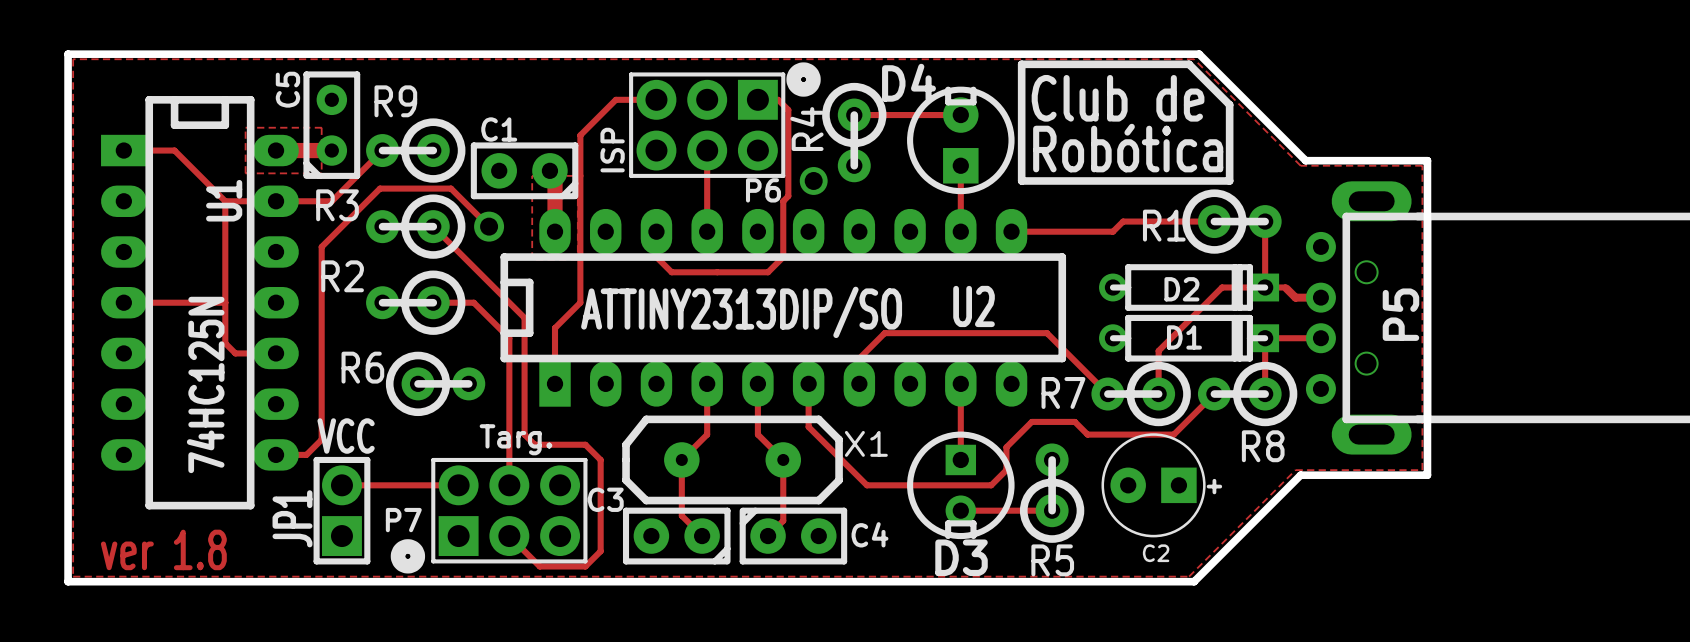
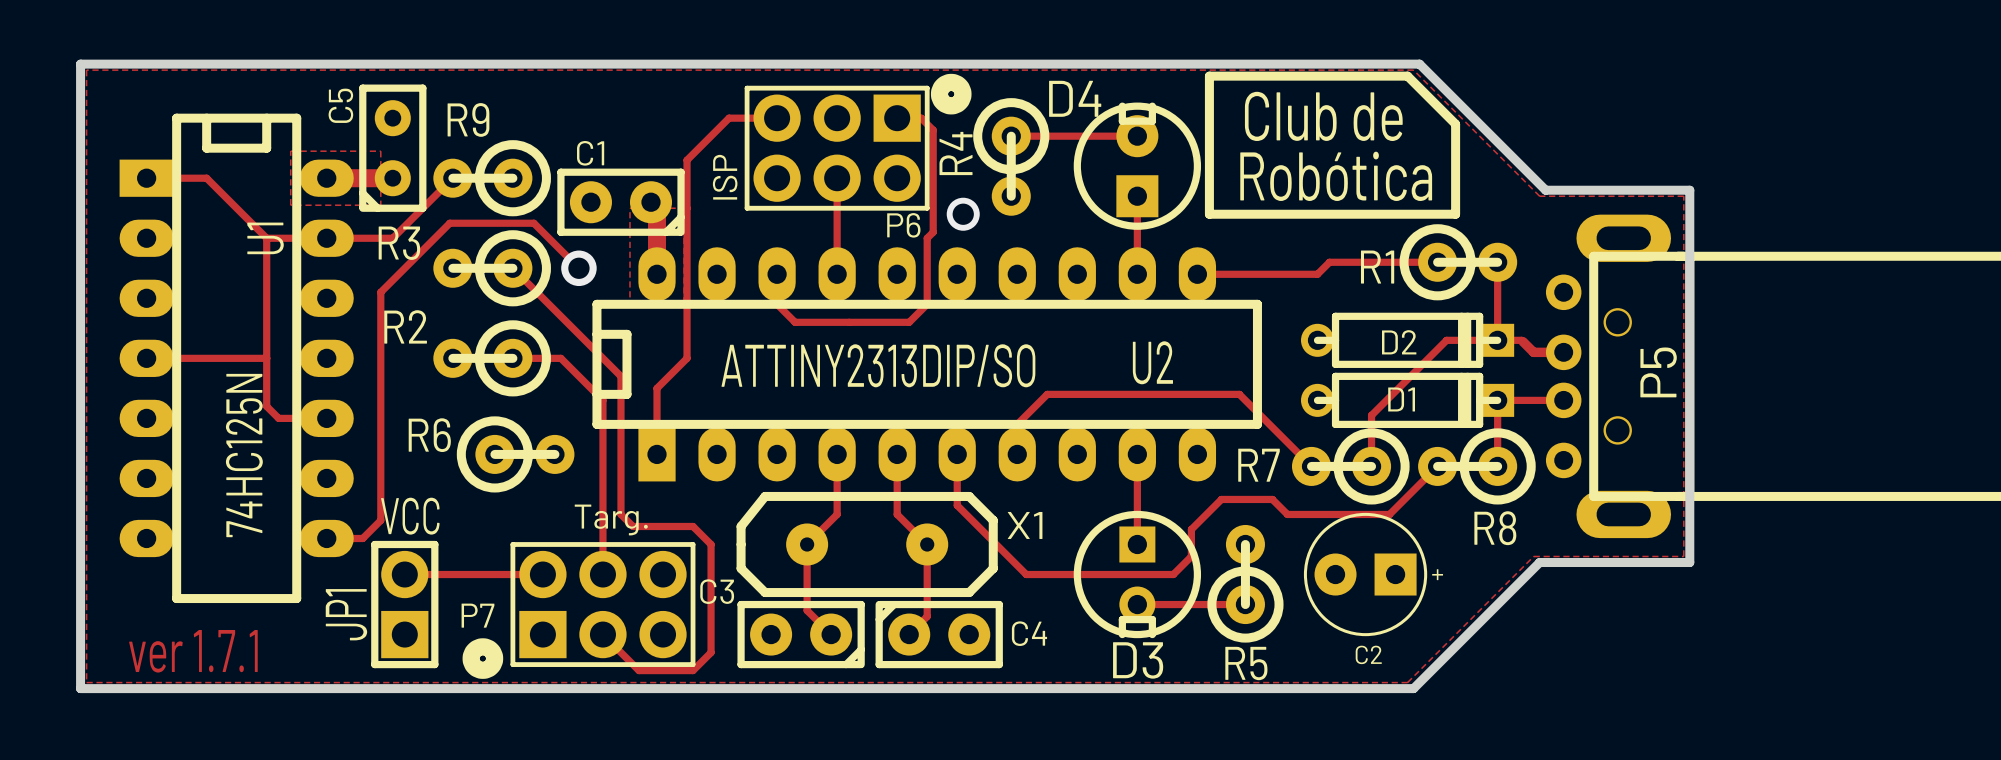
text: ver 1.8 (163, 549) -> ver 1.7.1 (193, 651)

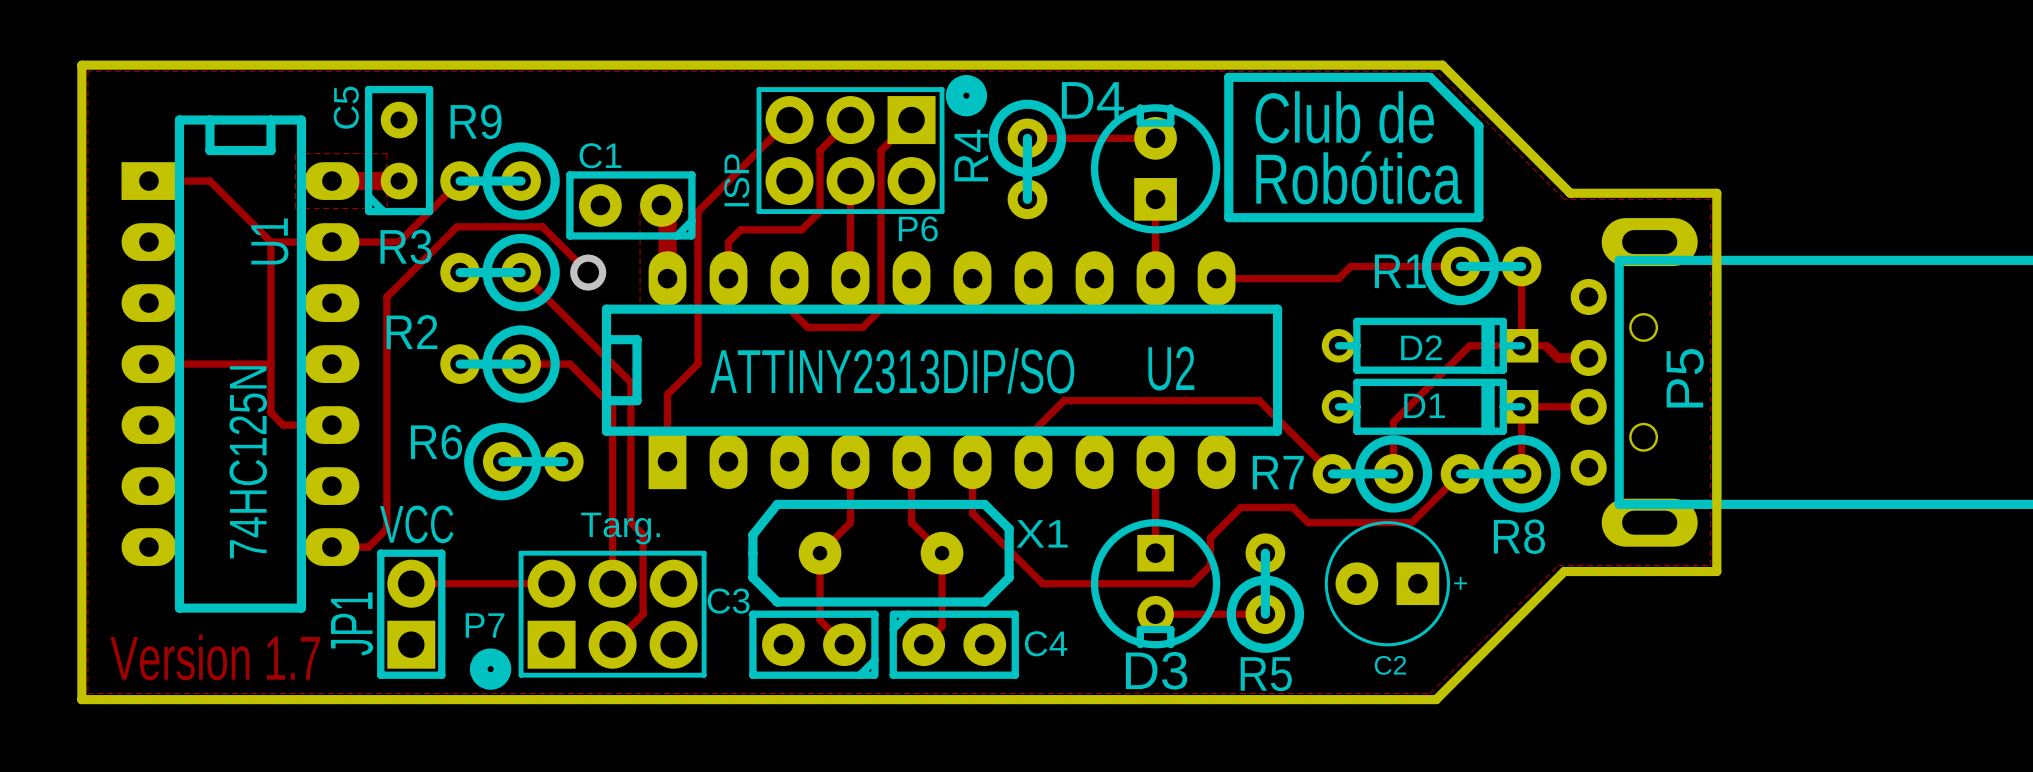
track: (777, 118) (729, 118) (687, 160) (687, 208) -> (789, 120) (698, 211)
track: none -> (850, 120) (820, 150) (820, 211) (801, 229) (740, 229) (728, 242) (728, 278)
track: (897, 118) (921, 118) (933, 130) (933, 232) (927, 238) (927, 304) (909, 322) (849, 322) -> (911, 120) (881, 150) (881, 309) (862, 327)
via: (963, 214) -> none
track: (632, 526) (693, 526) (711, 544) (711, 652) (693, 670) (638, 670) (602, 634) -> (643, 534) (643, 614) (612, 644)
text: ver 1.7.1 (193, 651) -> Version 1.7 (215, 657)

